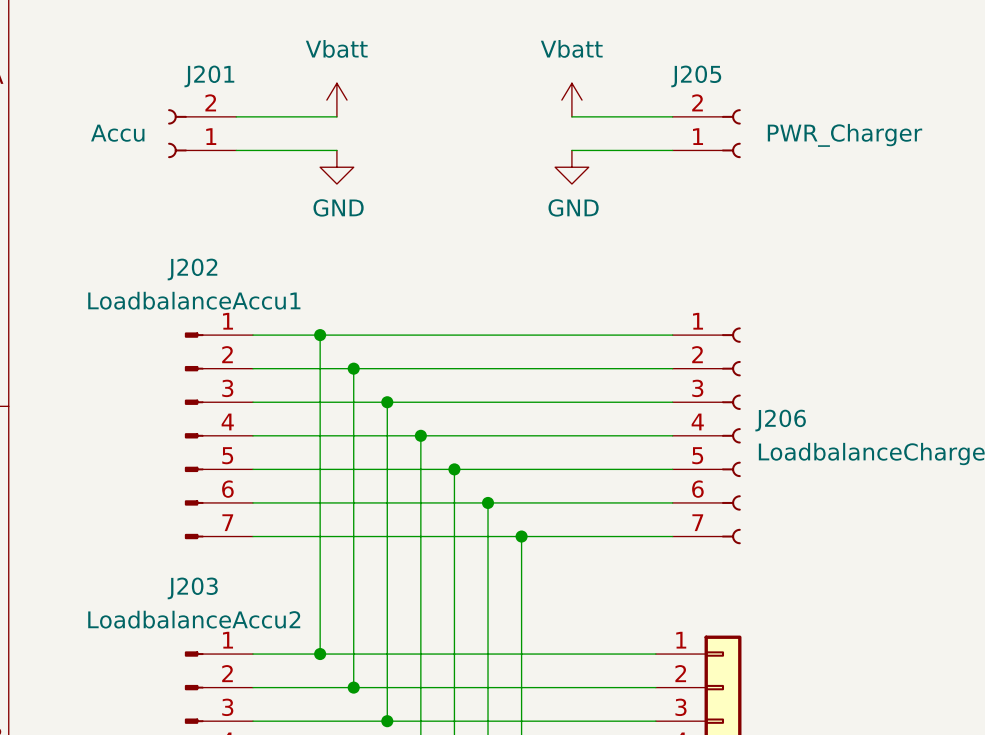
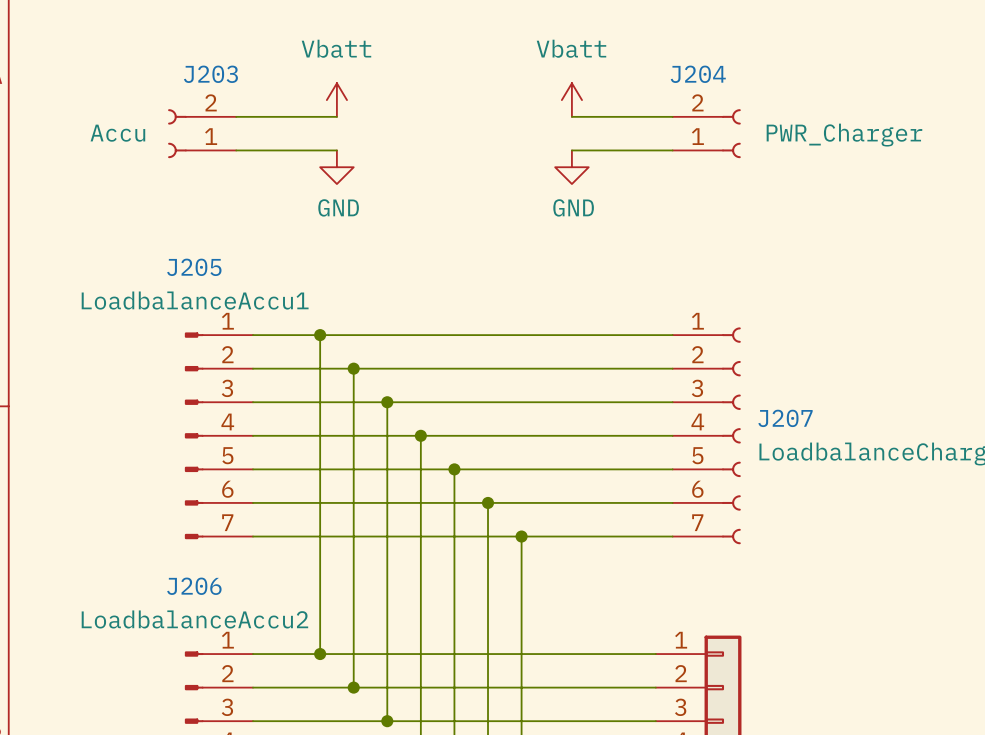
J201 name: J201 (209, 76) -> J203 (210, 74)
J205 name: J205 (696, 76) -> J204 (698, 74)
J202 name: J202 (192, 269) -> J205 (194, 267)
J206 name: J206 (780, 420) -> J207 (785, 418)
J203 name: J203 (192, 588) -> J206 (194, 586)

